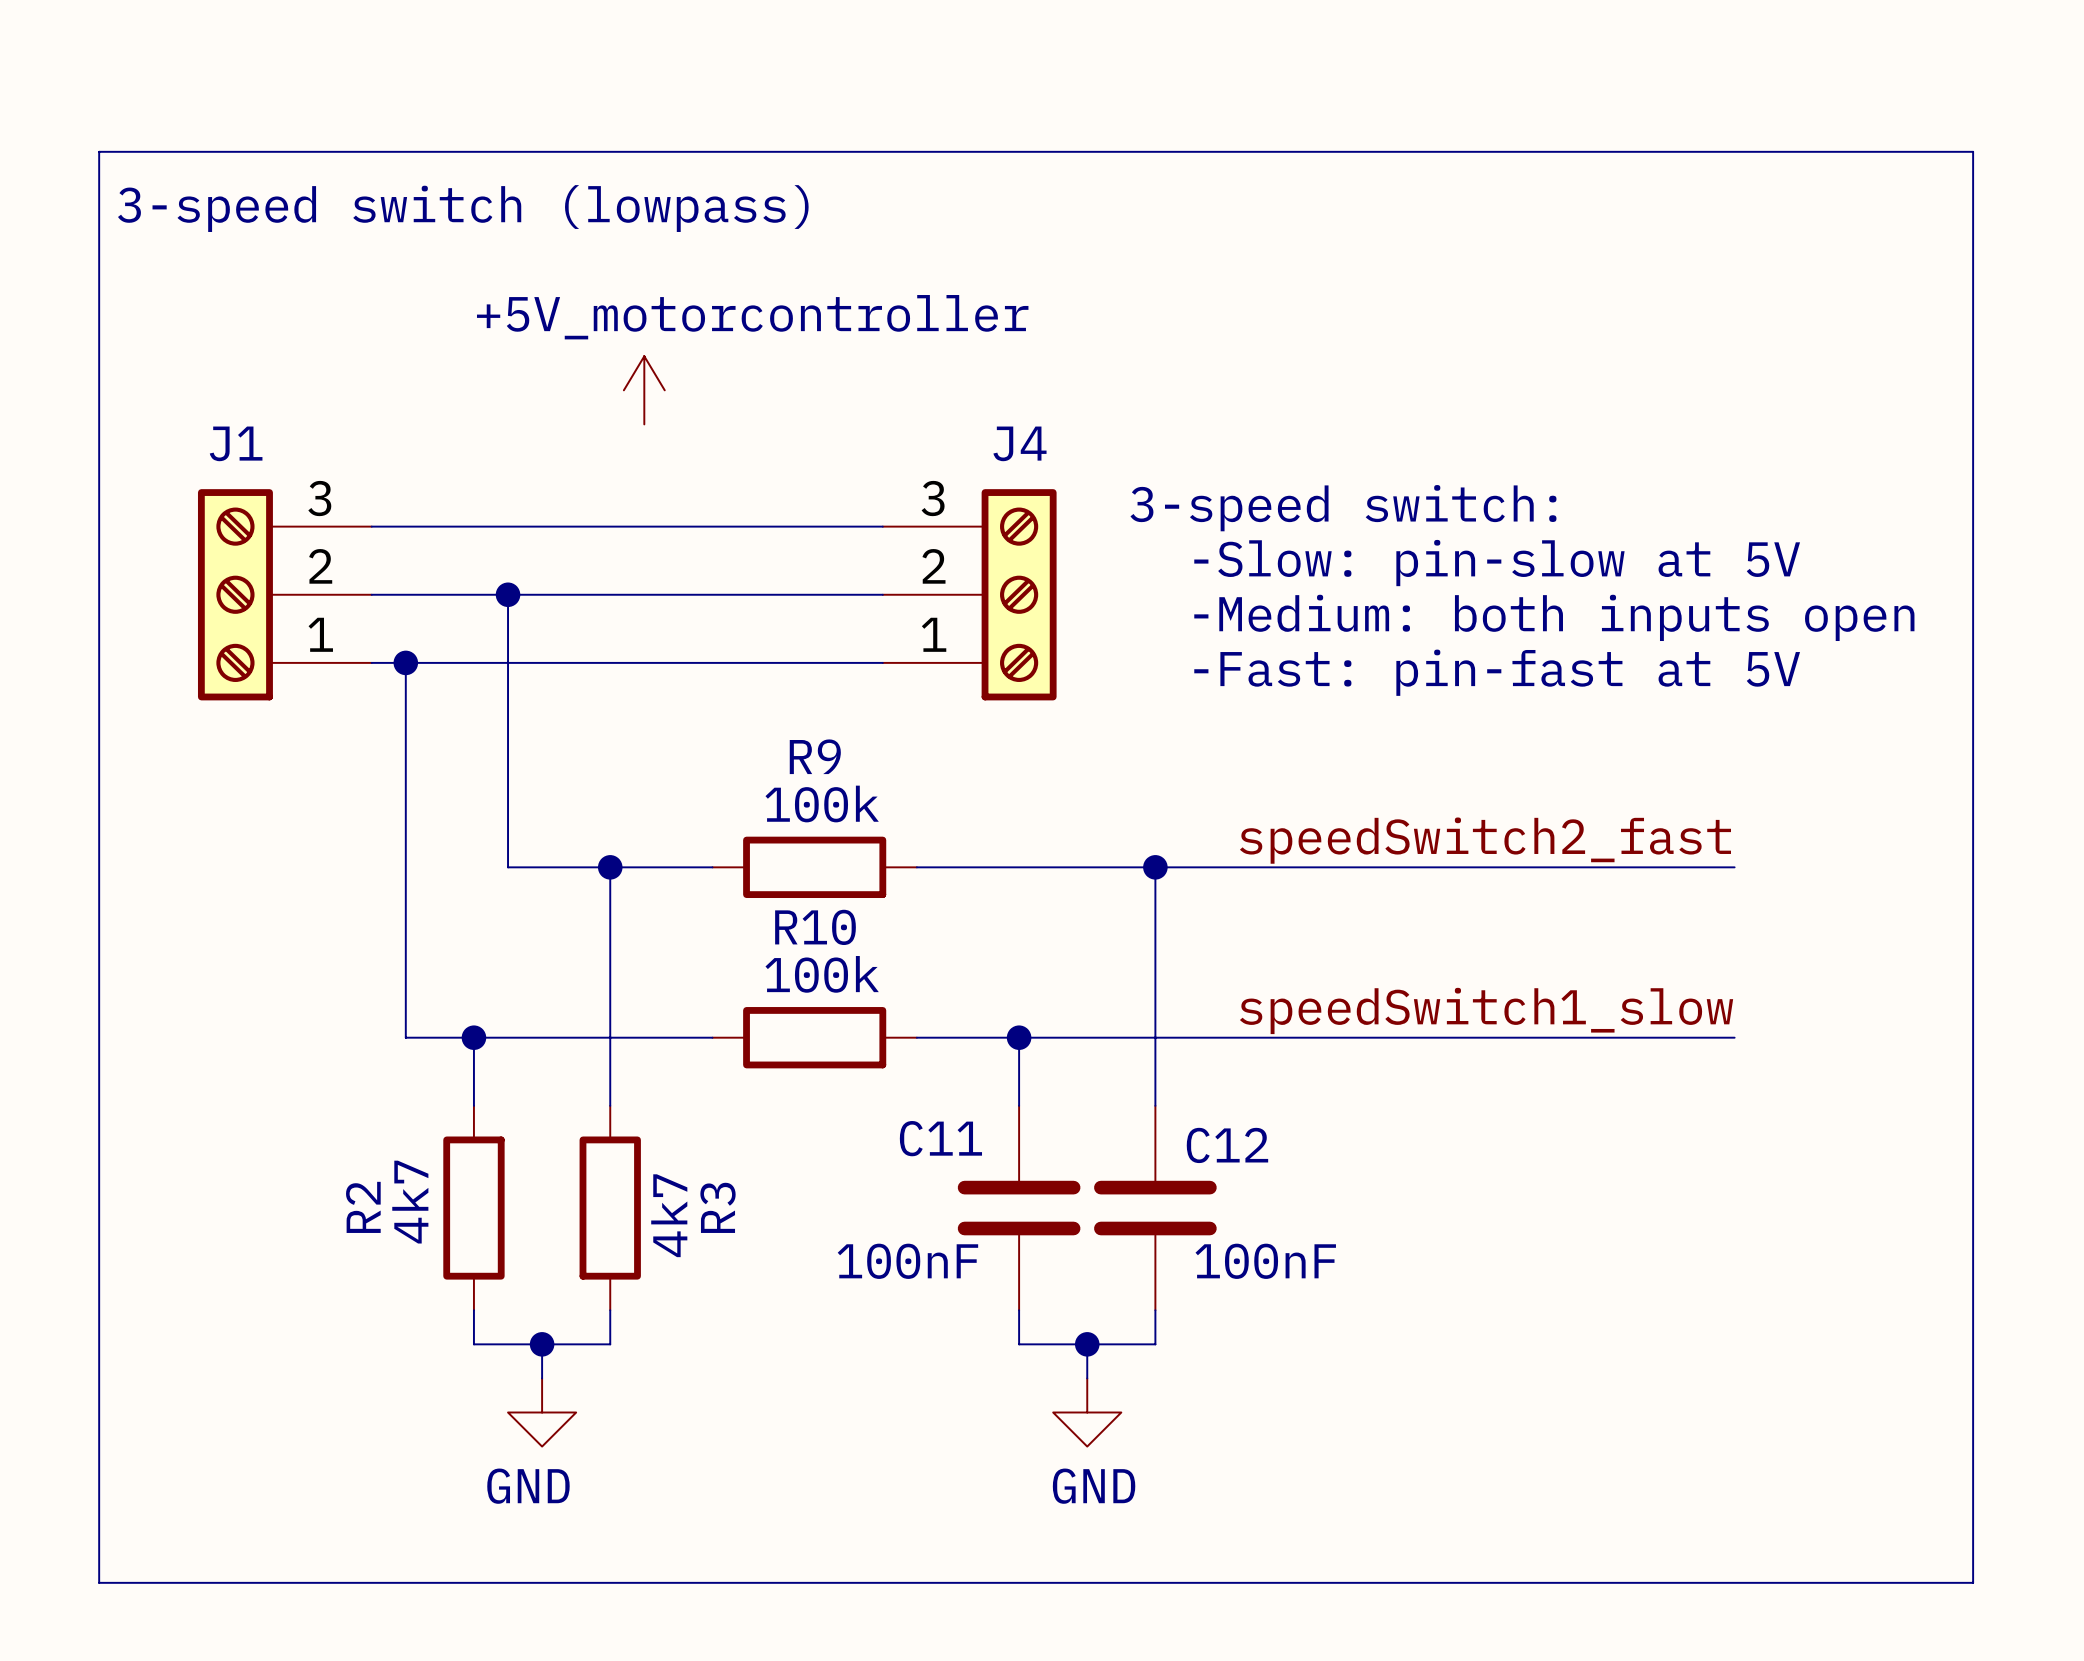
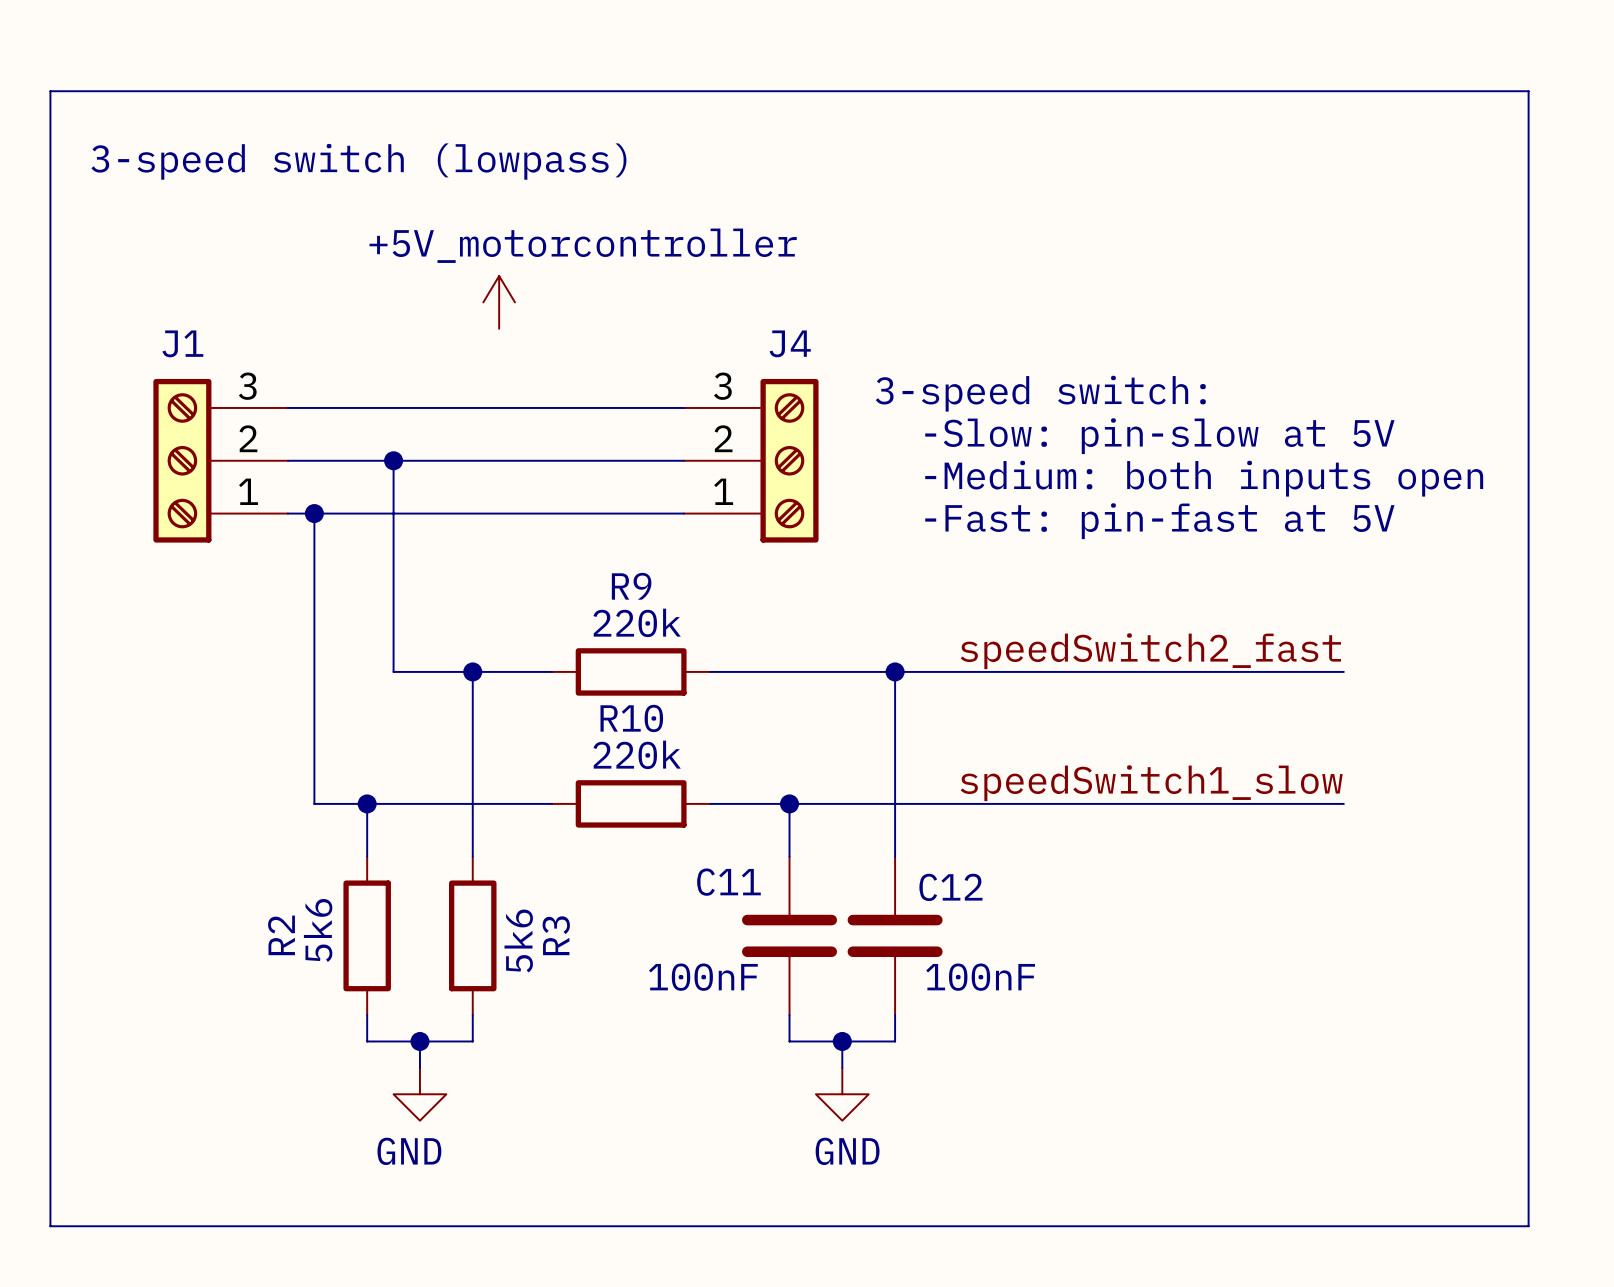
line: (1973, 151) (99, 151) (99, 1582) -> (1528, 117) (1528, 91) (50, 91) (50, 1226) (76, 1226)
R9 value: 100k (822, 804) -> 220k (637, 622)
R10 value: 100k (822, 974) -> 220k (637, 754)
R2 value: 4k7 (410, 1202) -> 5k6 (318, 930)
R3 value: 4k7 (669, 1215) -> 5k6 (518, 941)

